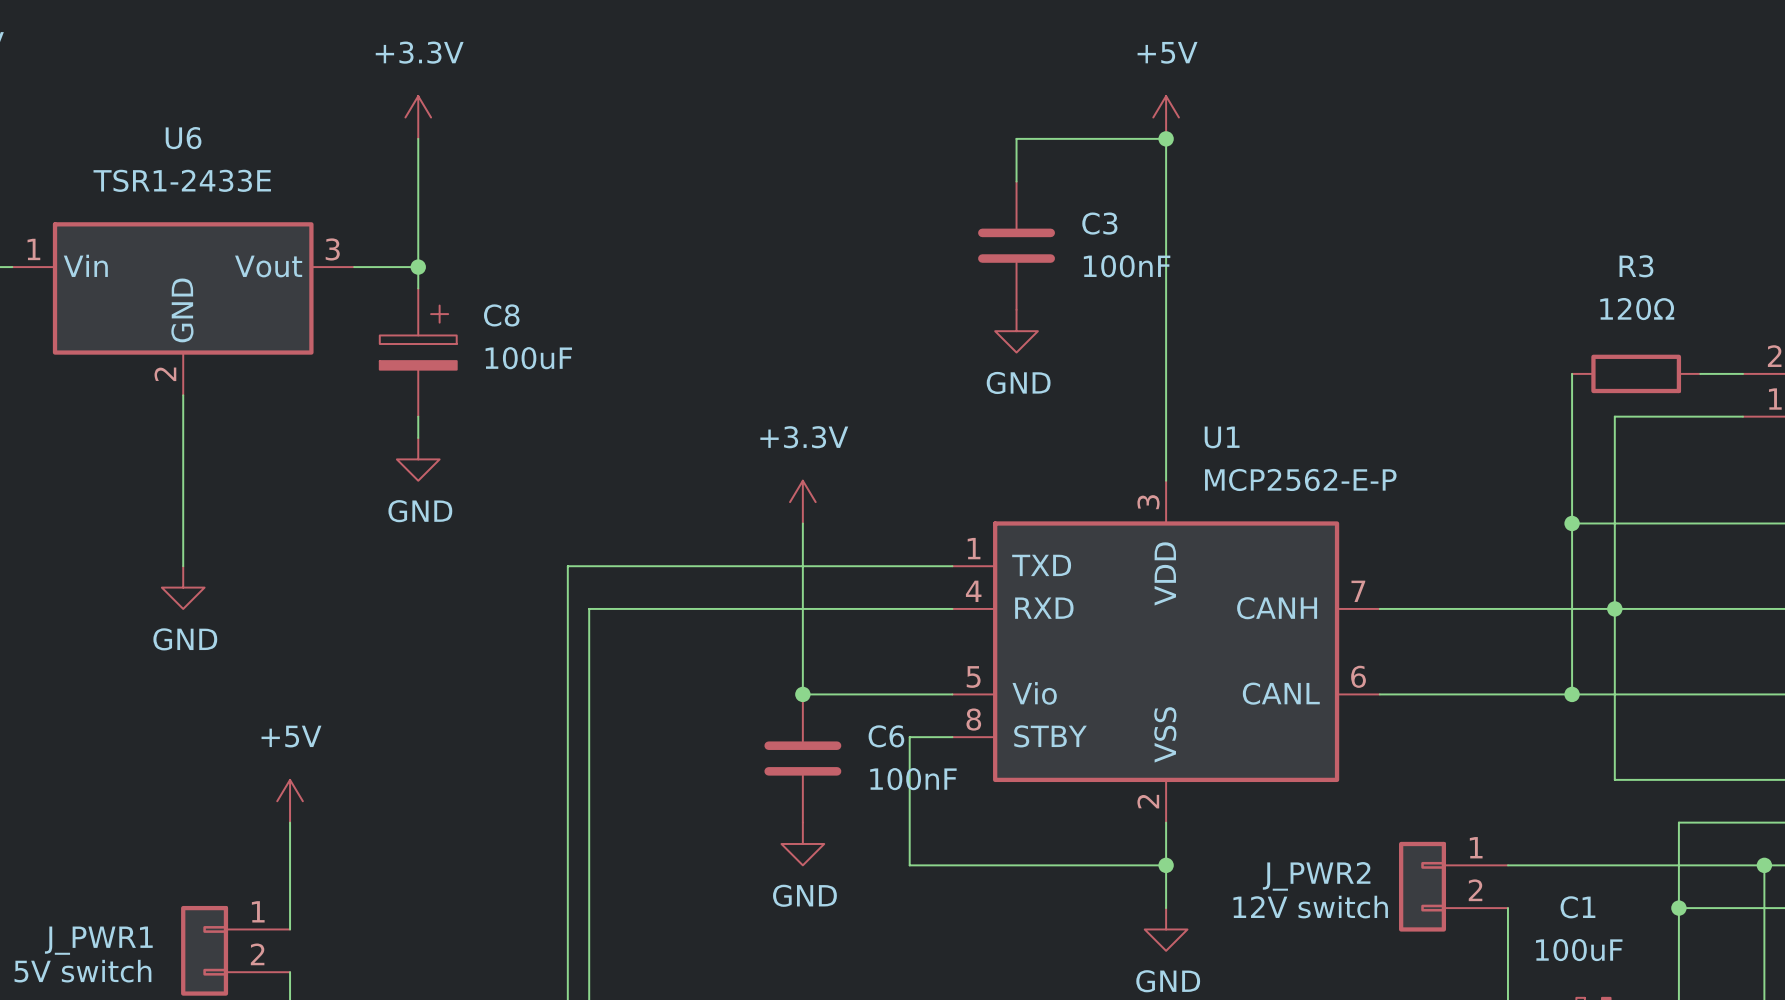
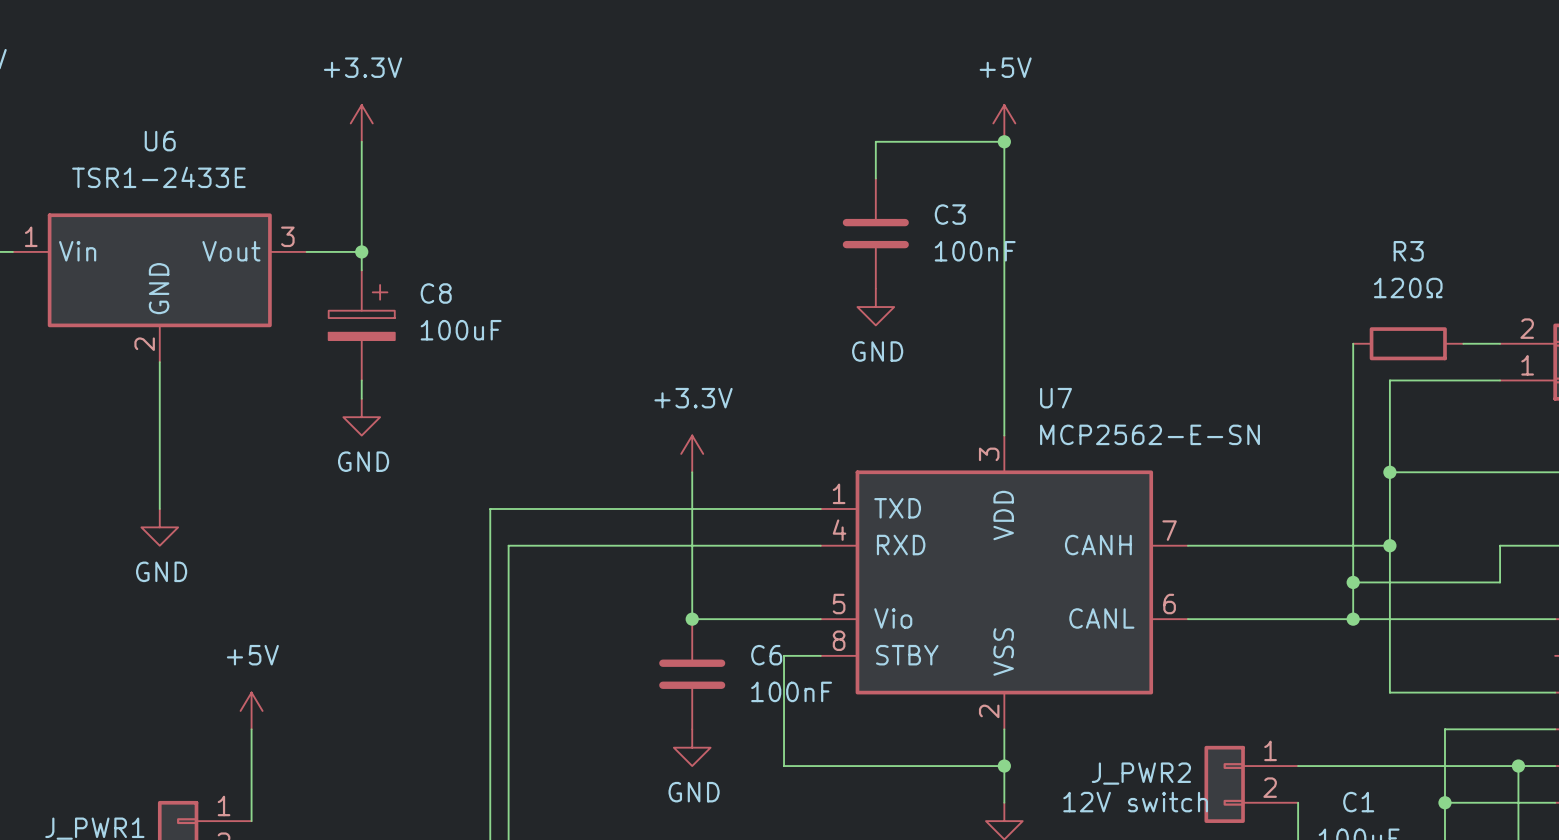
U1 name: U1 (1222, 437) -> U7 (1056, 398)
U1 value: MCP2562-E-P (1300, 479) -> MCP2562-E-SN (1150, 434)
wire: (1572, 523) (1614, 523) -> none
junction position: (1572, 523) -> (1389, 472)
wire: (1614, 608) (1743, 608) -> (1353, 582) (1500, 582) (1500, 545)
junction: none -> (1353, 582)

